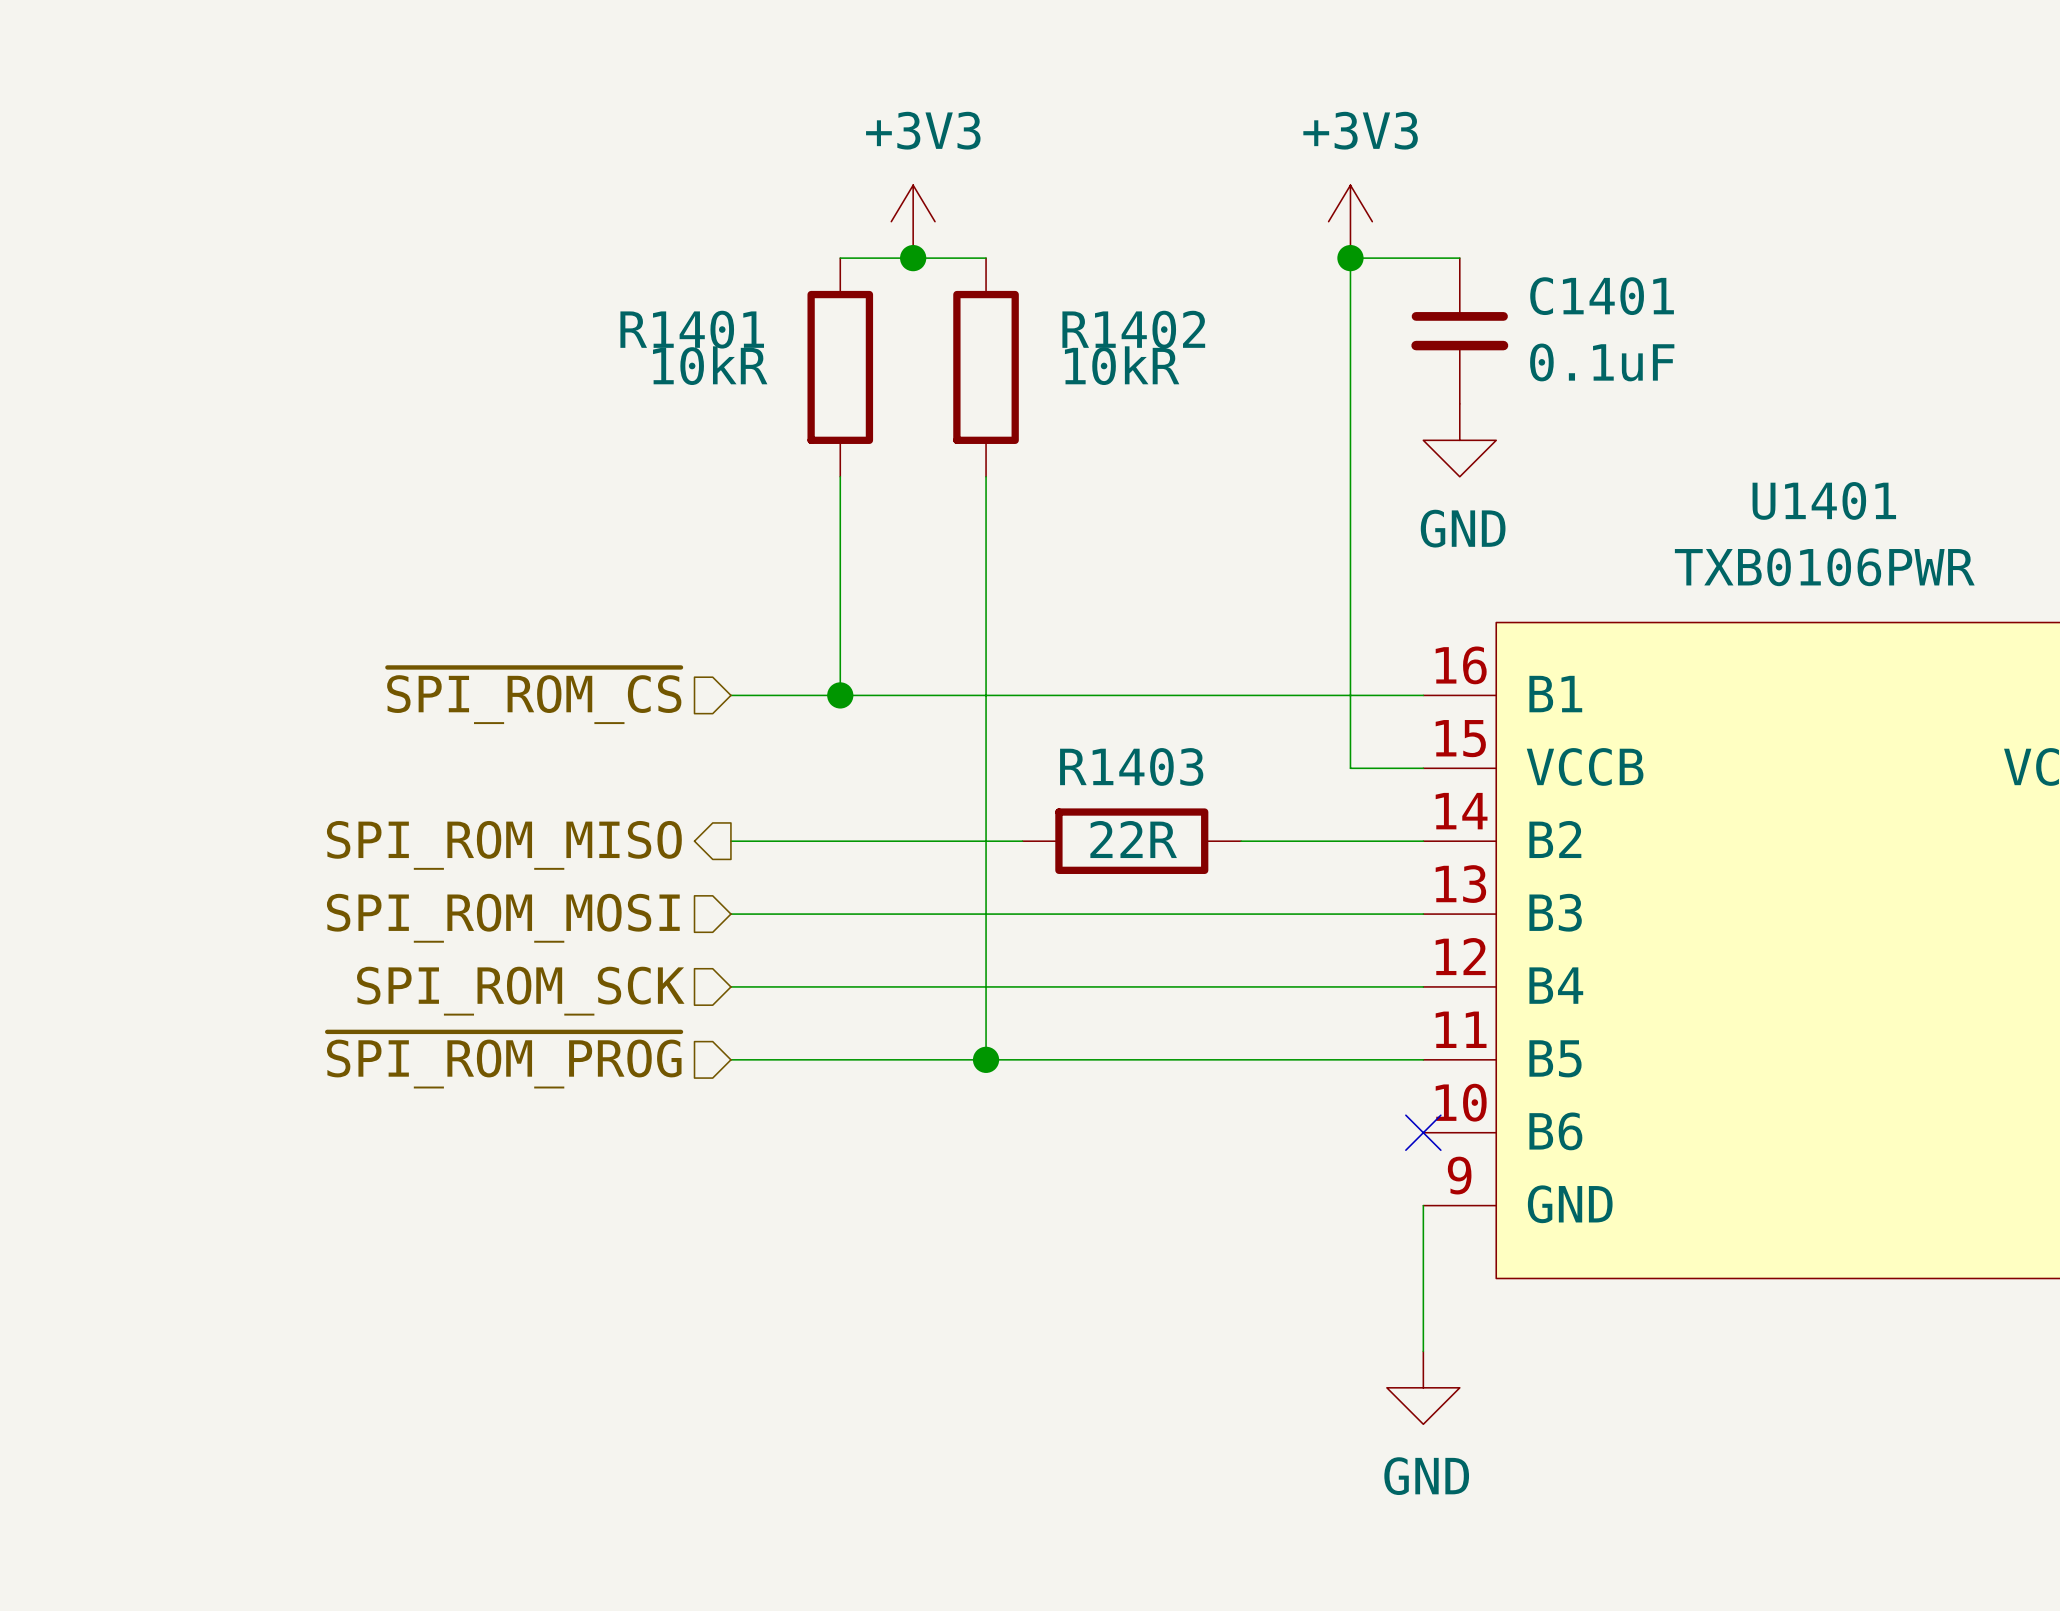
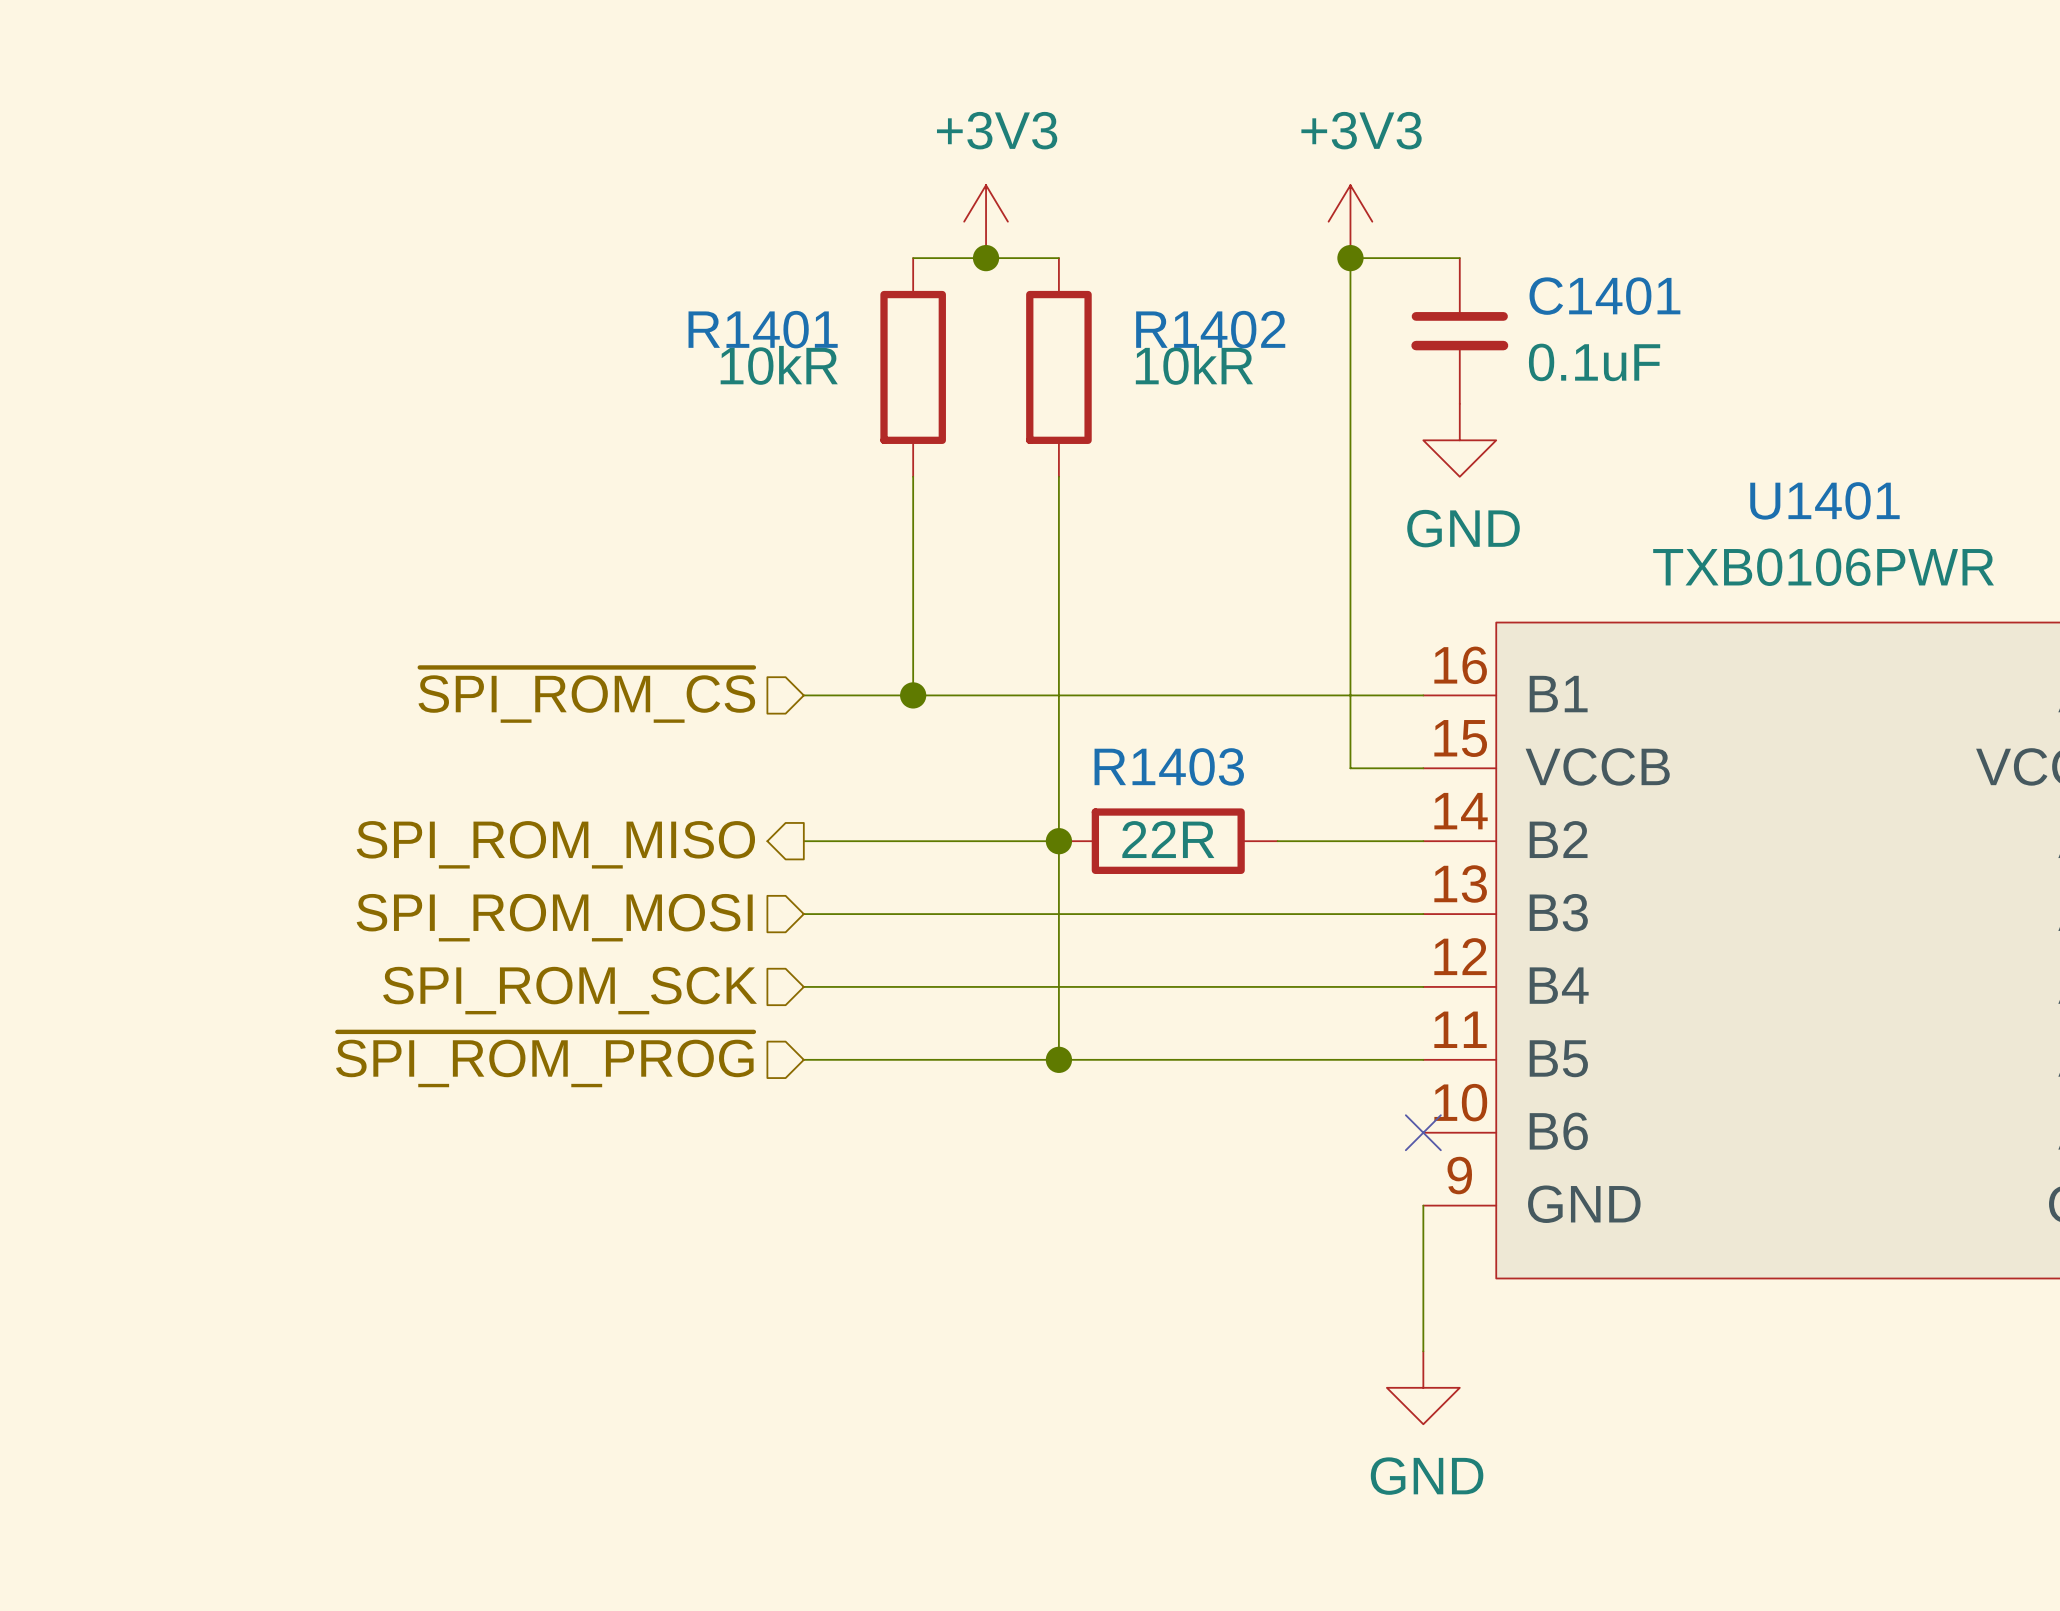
power symbol position: +3V3 (913, 221) -> +3V3 (986, 221)
wire: (840, 258) (913, 258) -> (986, 258) (1058, 258)
junction position: (913, 258) -> (986, 258)
R1401 position: (840, 367) -> (913, 367)
R1402 position: (986, 367) -> (1058, 367)
wire: (840, 476) (840, 695) -> (913, 476) (913, 695)
wire: (986, 476) (986, 1059) -> (1058, 476) (1058, 1059)
hierarchical label position: ~{SPI_ROM_CS} (534, 695) -> ~{SPI_ROM_CS} (586, 695)
wire: (730, 695) (803, 695) -> none
junction position: (840, 695) -> (913, 695)
wire: (730, 841) (803, 841) -> none
junction: none -> (1058, 841)
R1403 position: (1131, 841) -> (1168, 841)
hierarchical label position: SPI_ROM_MISO (504, 845) -> SPI_ROM_MISO (555, 844)
wire: (730, 914) (803, 914) -> none
hierarchical label position: SPI_ROM_MOSI (503, 918) -> SPI_ROM_MOSI (554, 917)
wire: (730, 986) (803, 986) -> none
hierarchical label position: SPI_ROM_SCK (520, 991) -> SPI_ROM_SCK (570, 990)
wire: (730, 1059) (803, 1059) -> none
junction position: (986, 1059) -> (1058, 1059)
hierarchical label position: ~{SPI_ROM_PROG} (504, 1060) -> ~{SPI_ROM_PROG} (545, 1059)

